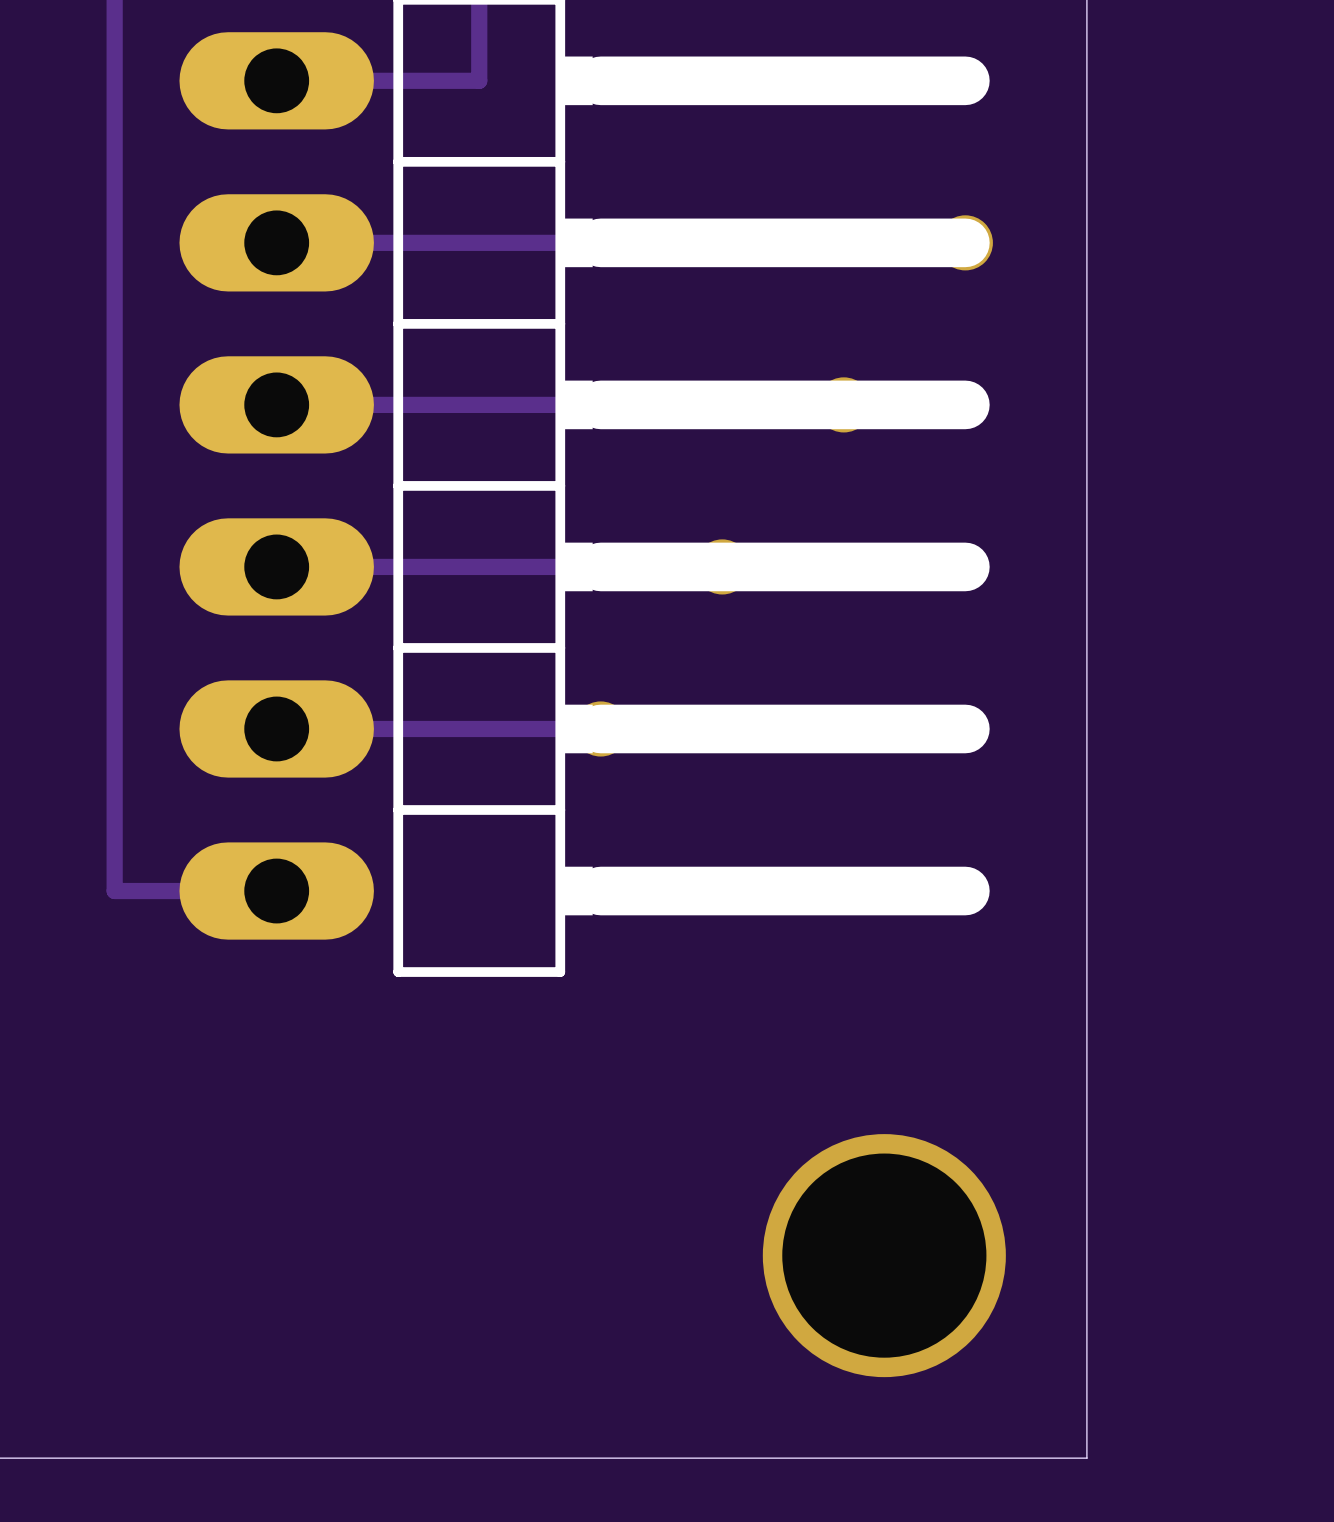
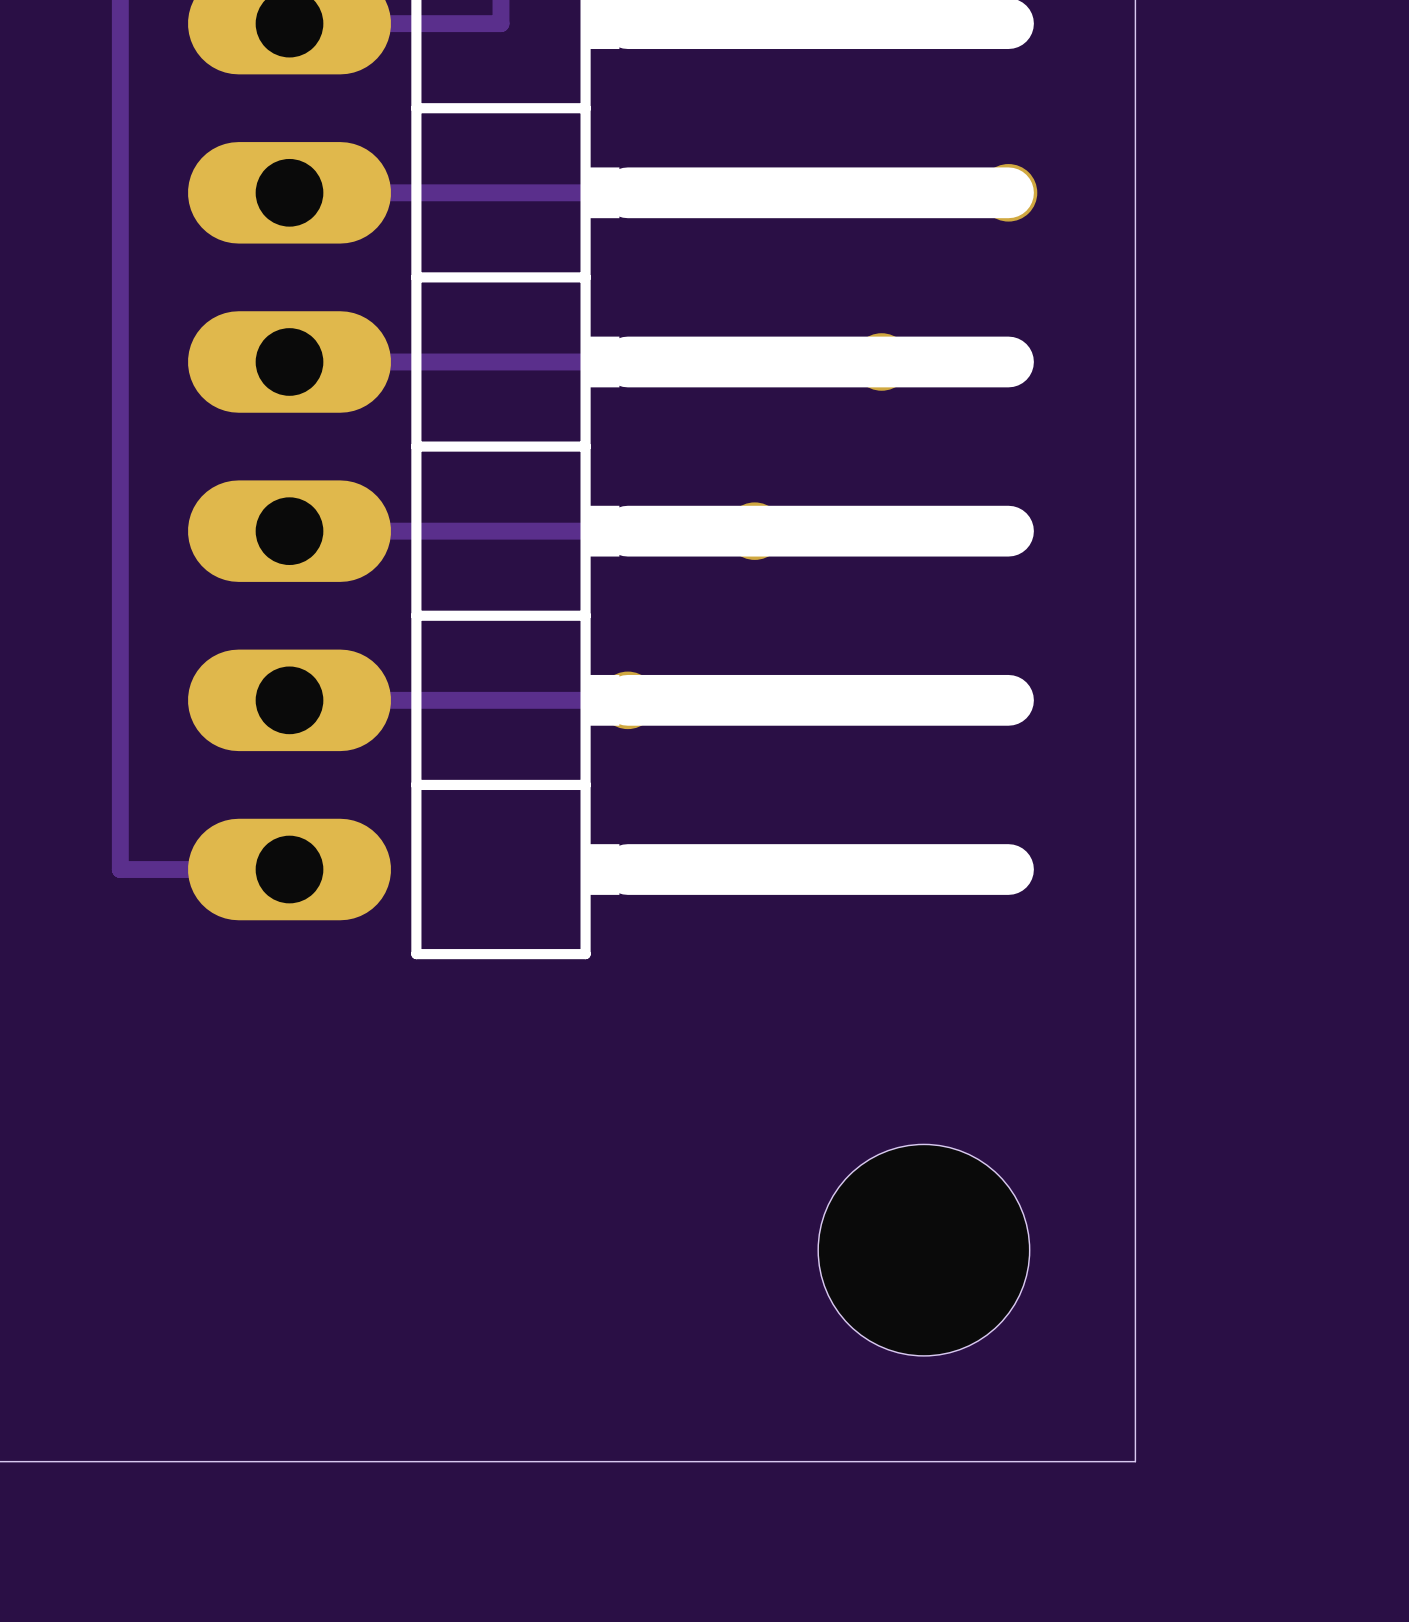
via: (884, 1255) -> none
hole: none -> (923, 1250)

